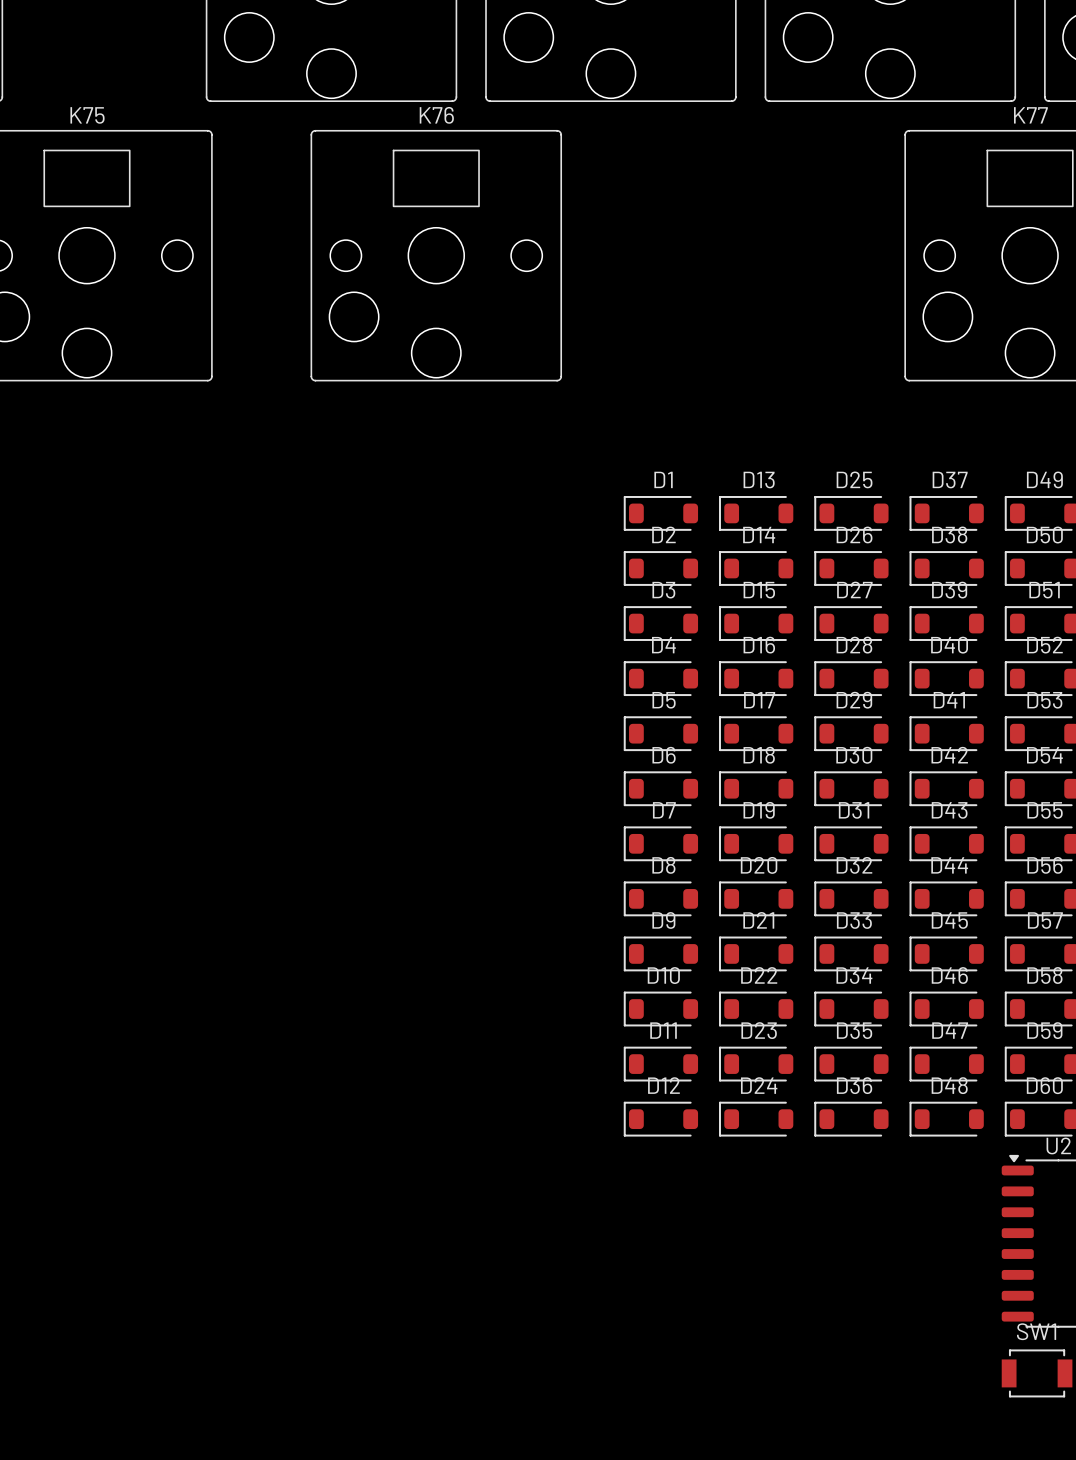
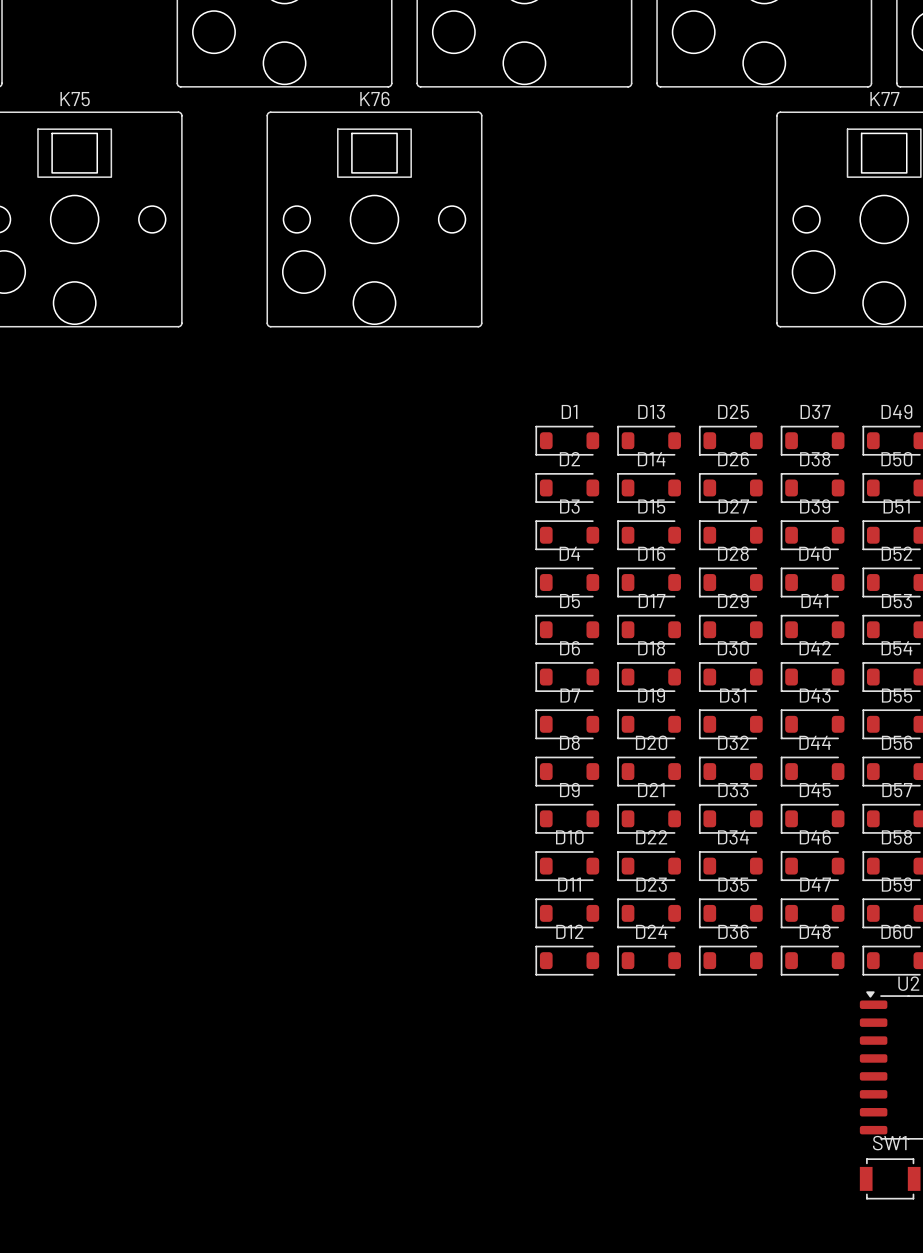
part: none -> (74, 153)
part: none -> (374, 153)
part: none -> (884, 153)

